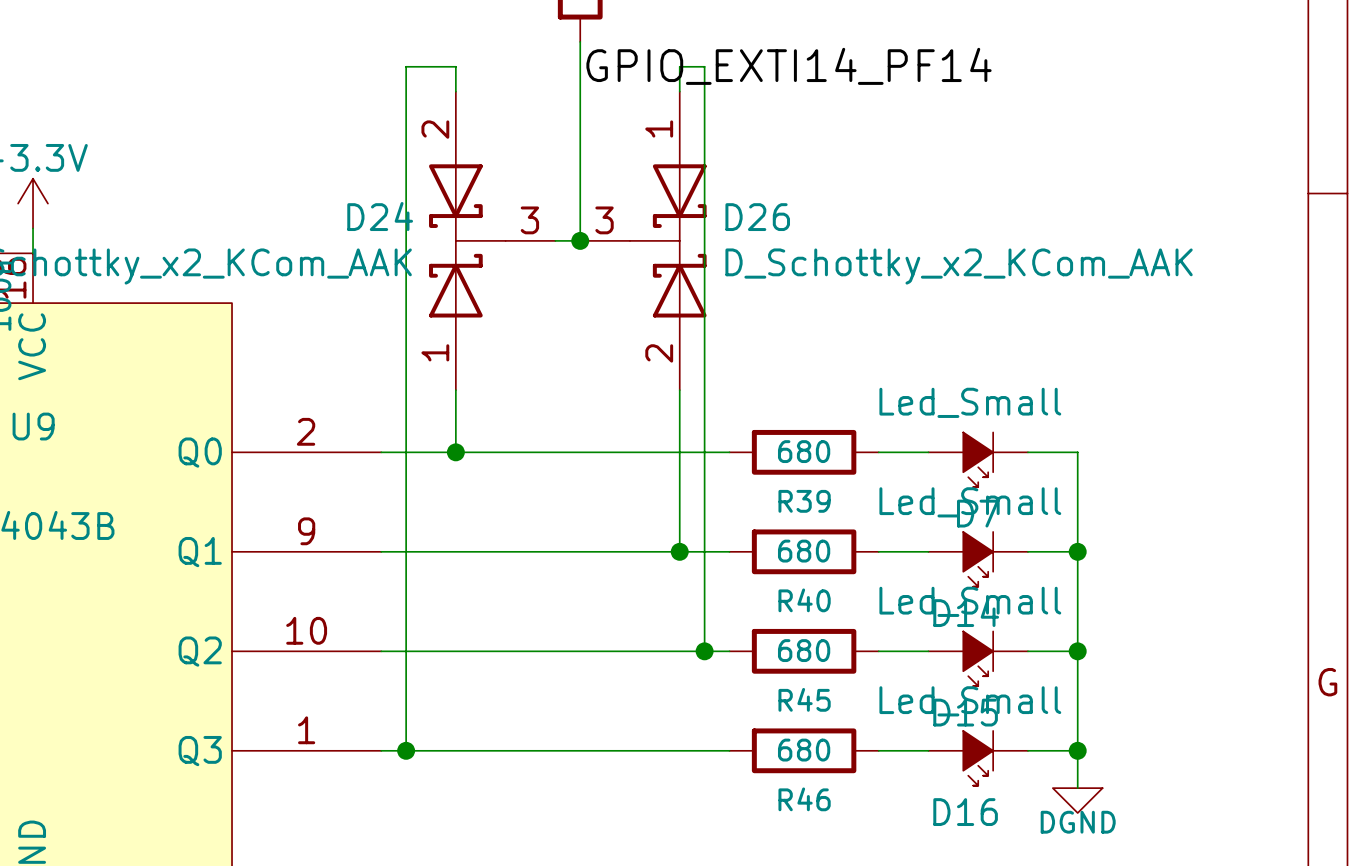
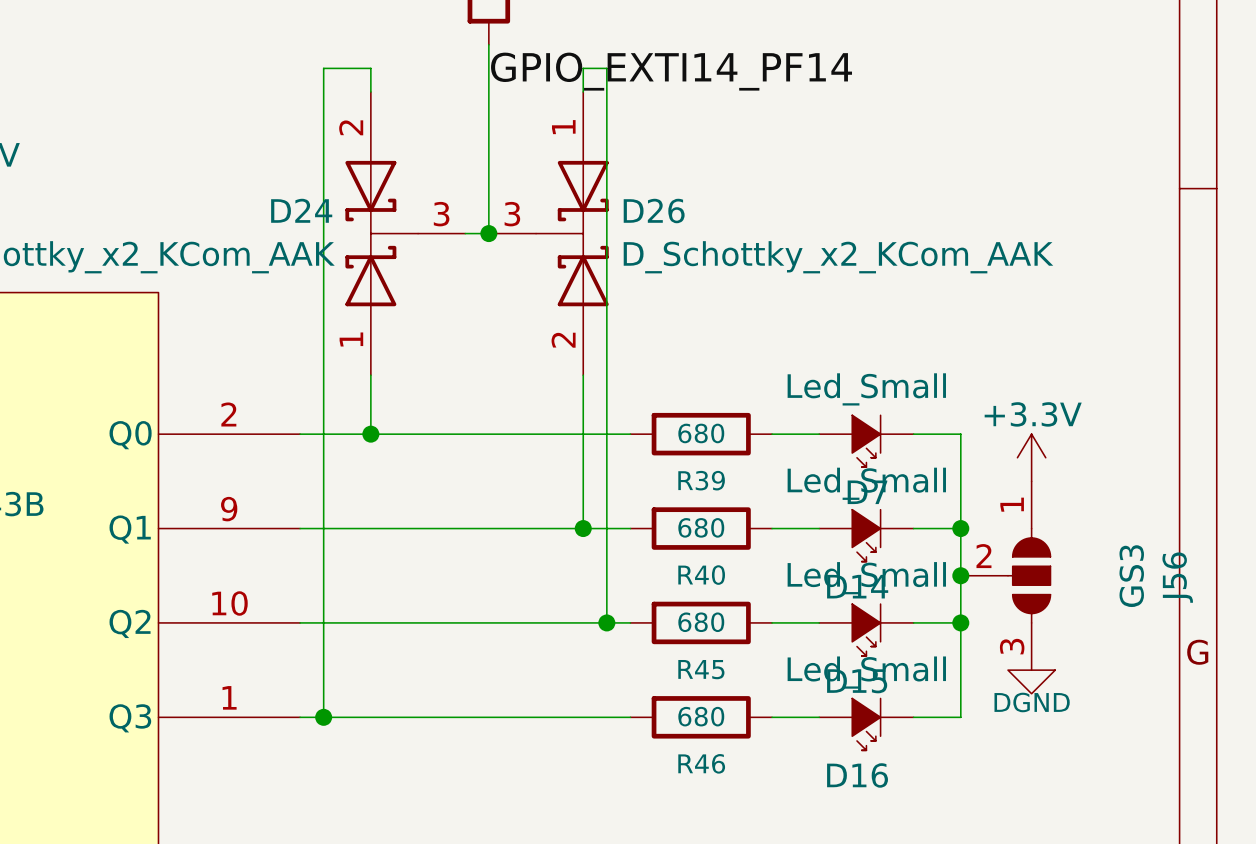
power symbol: none -> +3.3V (1031, 457)
junction: none -> (960, 575)
J56: none -> GS3 (1005, 575)
wire: (1077, 750) (1077, 788) -> none
junction: (1077, 750) -> none
power symbol position: DGND (1077, 800) -> DGND (1031, 681)

